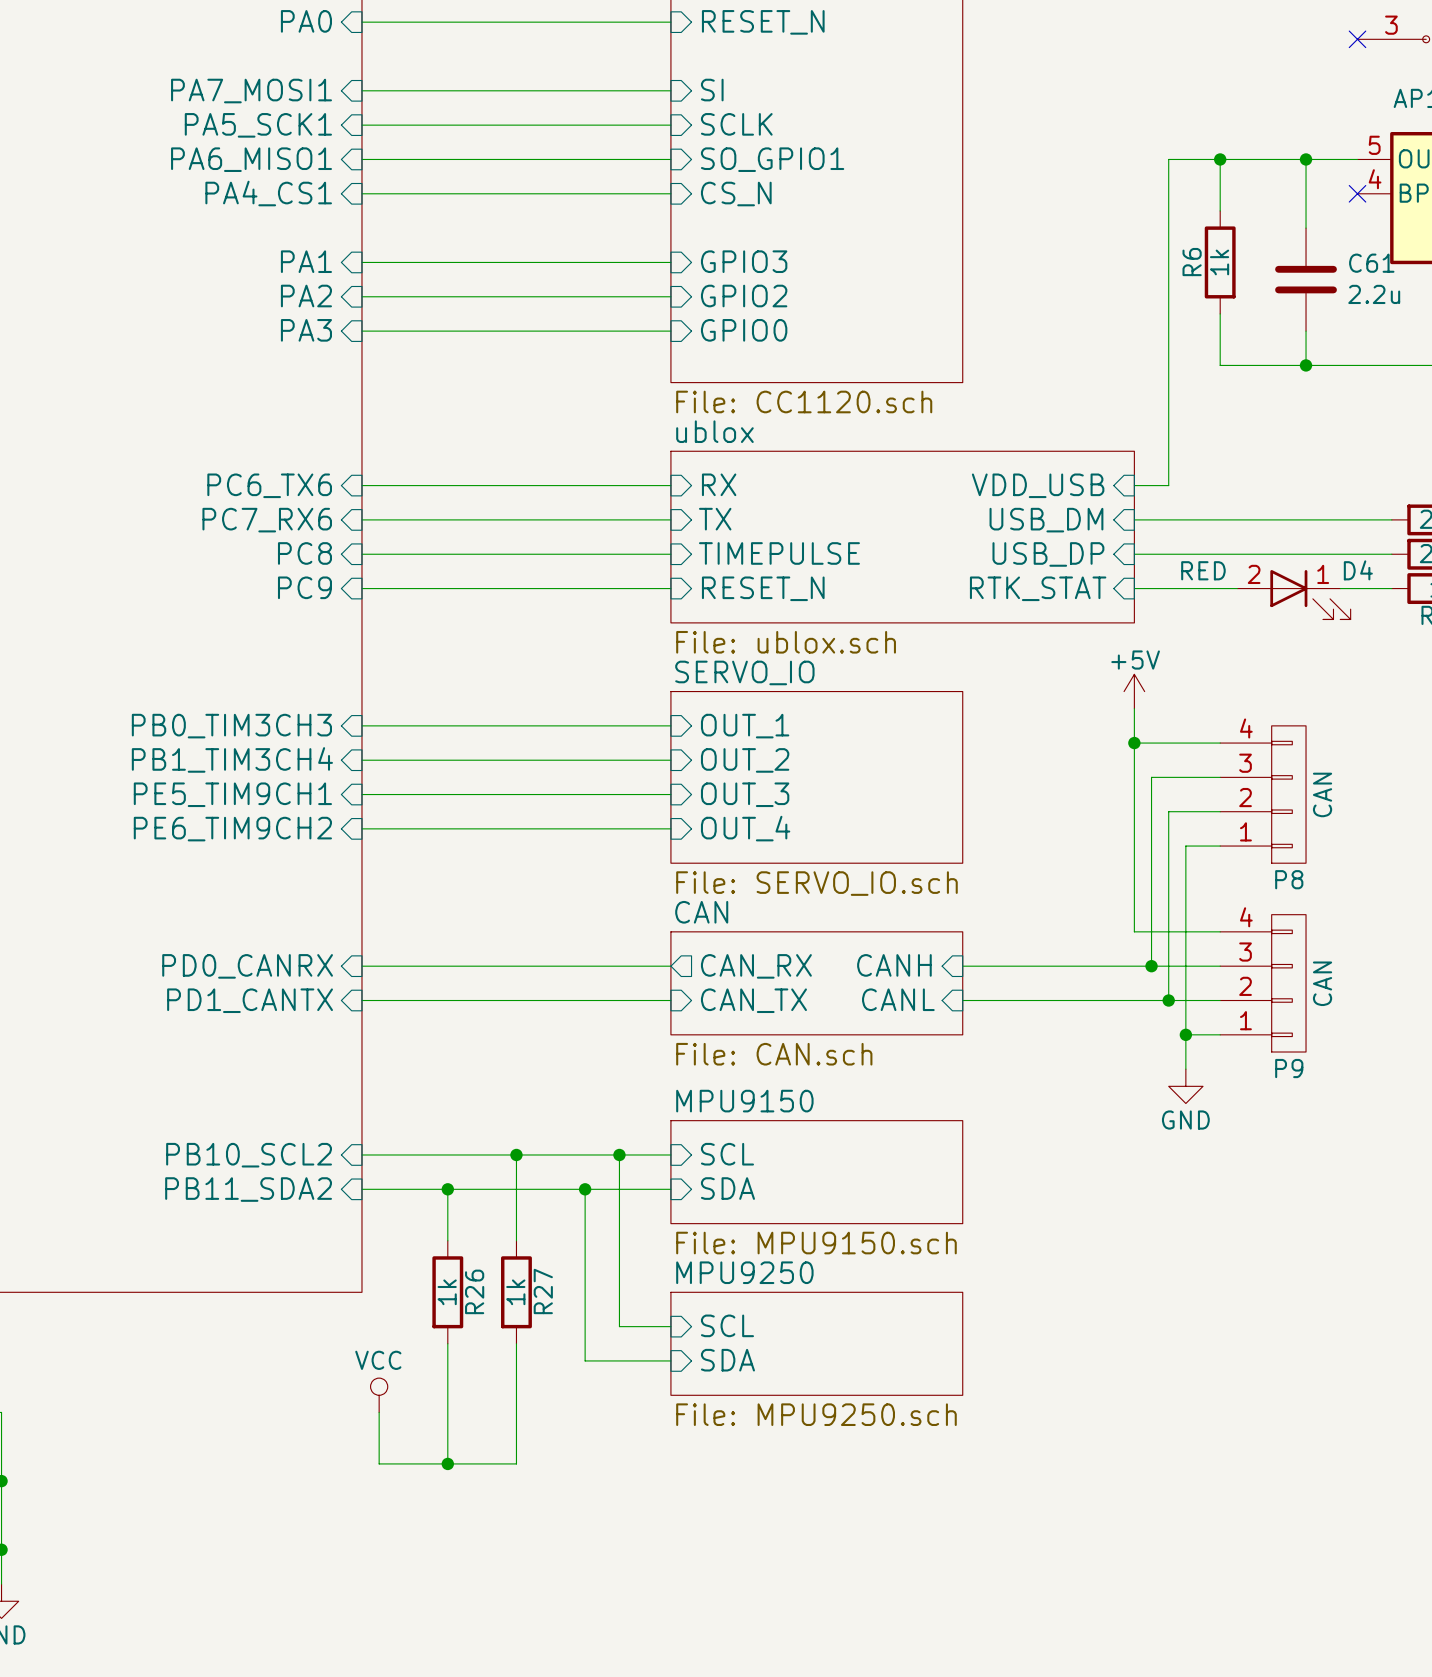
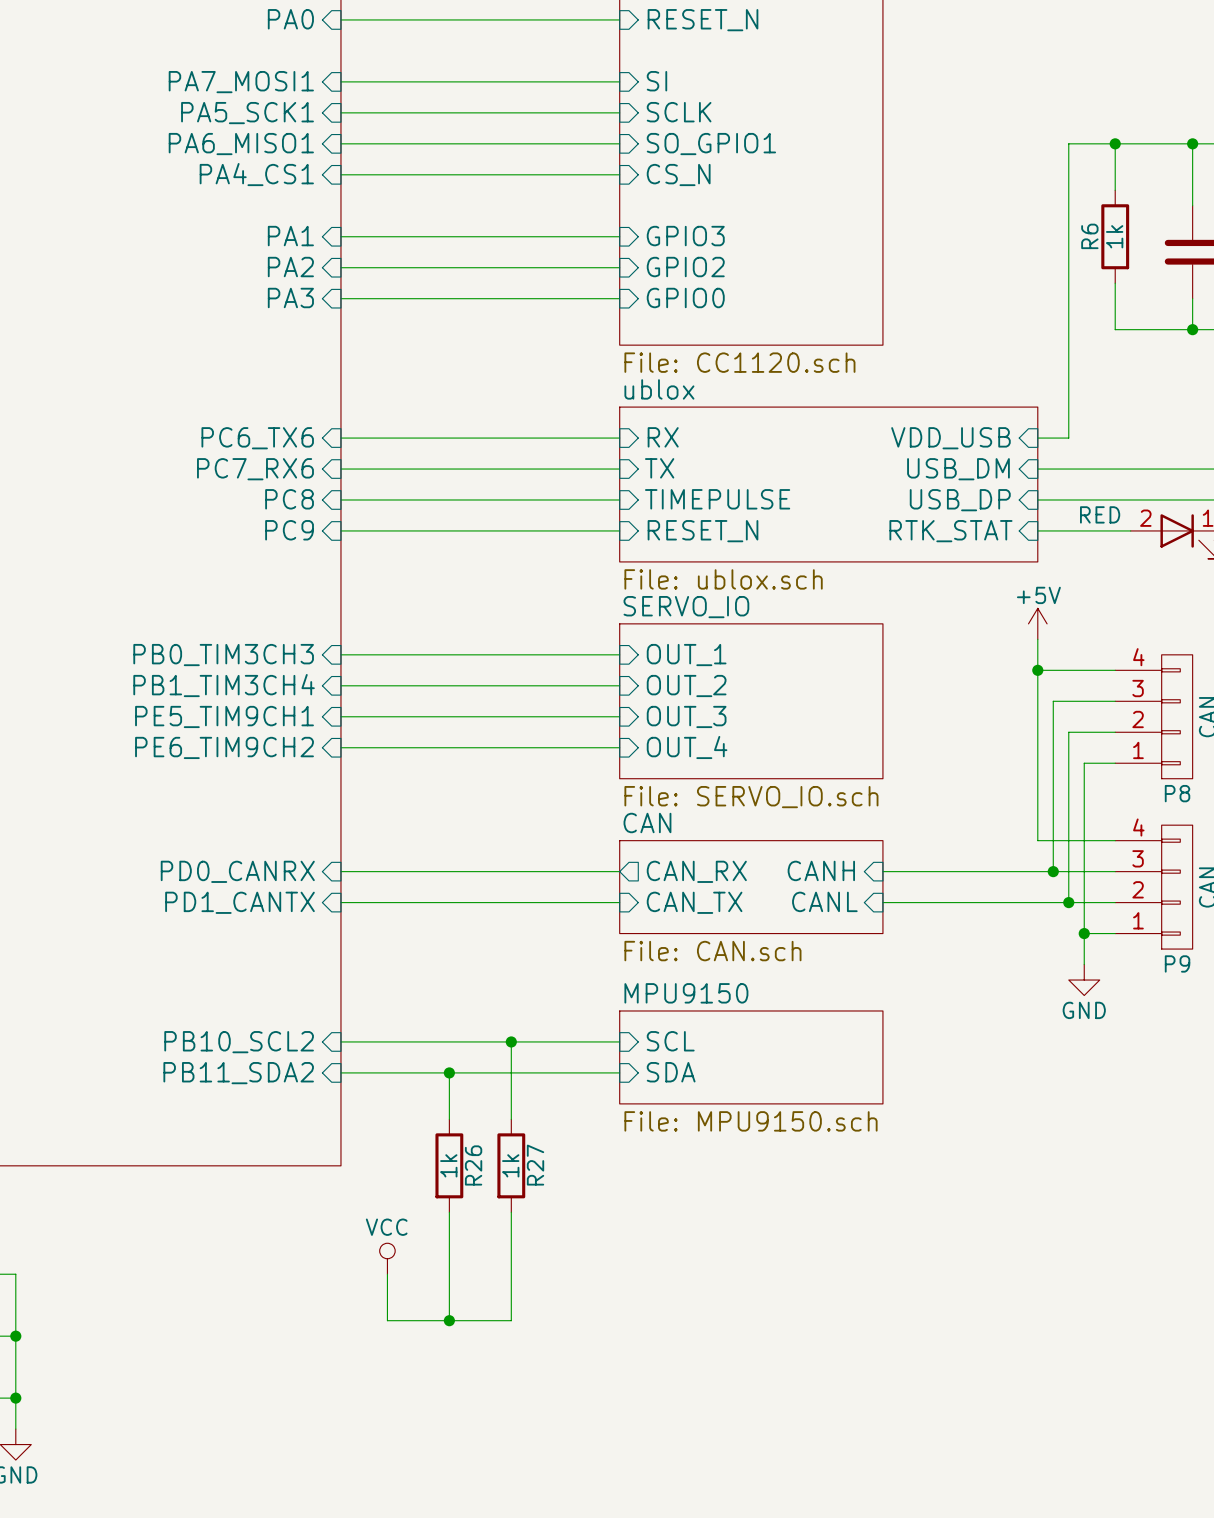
wire: (516, 1154) (516, 1240) -> (511, 1041) (511, 1119)
junction: (516, 1154) -> none
junction: none -> (511, 1041)
wire: (619, 1154) (619, 1326) (670, 1326) -> none
junction: (619, 1154) -> none
wire: (447, 1189) (447, 1240) -> (449, 1072) (449, 1119)
junction: (447, 1189) -> none
junction: none -> (449, 1072)
wire: (585, 1189) (585, 1360) (670, 1360) -> none
junction: (585, 1189) -> none
R26 position: (447, 1292) -> (449, 1165)
R27 position: (516, 1292) -> (511, 1165)
sheet pin: SCL (727, 1325) -> none
wire: (447, 1343) (447, 1463) -> (449, 1212) (449, 1320)
wire: (516, 1343) (516, 1463) -> (511, 1212) (511, 1320) (480, 1320)
sheet MPU9250: File: MPU9250.sch (816, 1343) -> none
sheet pin: SDA (727, 1360) -> none
power symbol position: VCC (379, 1395) -> VCC (387, 1258)
wire: (379, 1412) (379, 1463) (413, 1463) -> (387, 1274) (387, 1320)
junction position: (447, 1463) -> (449, 1320)

